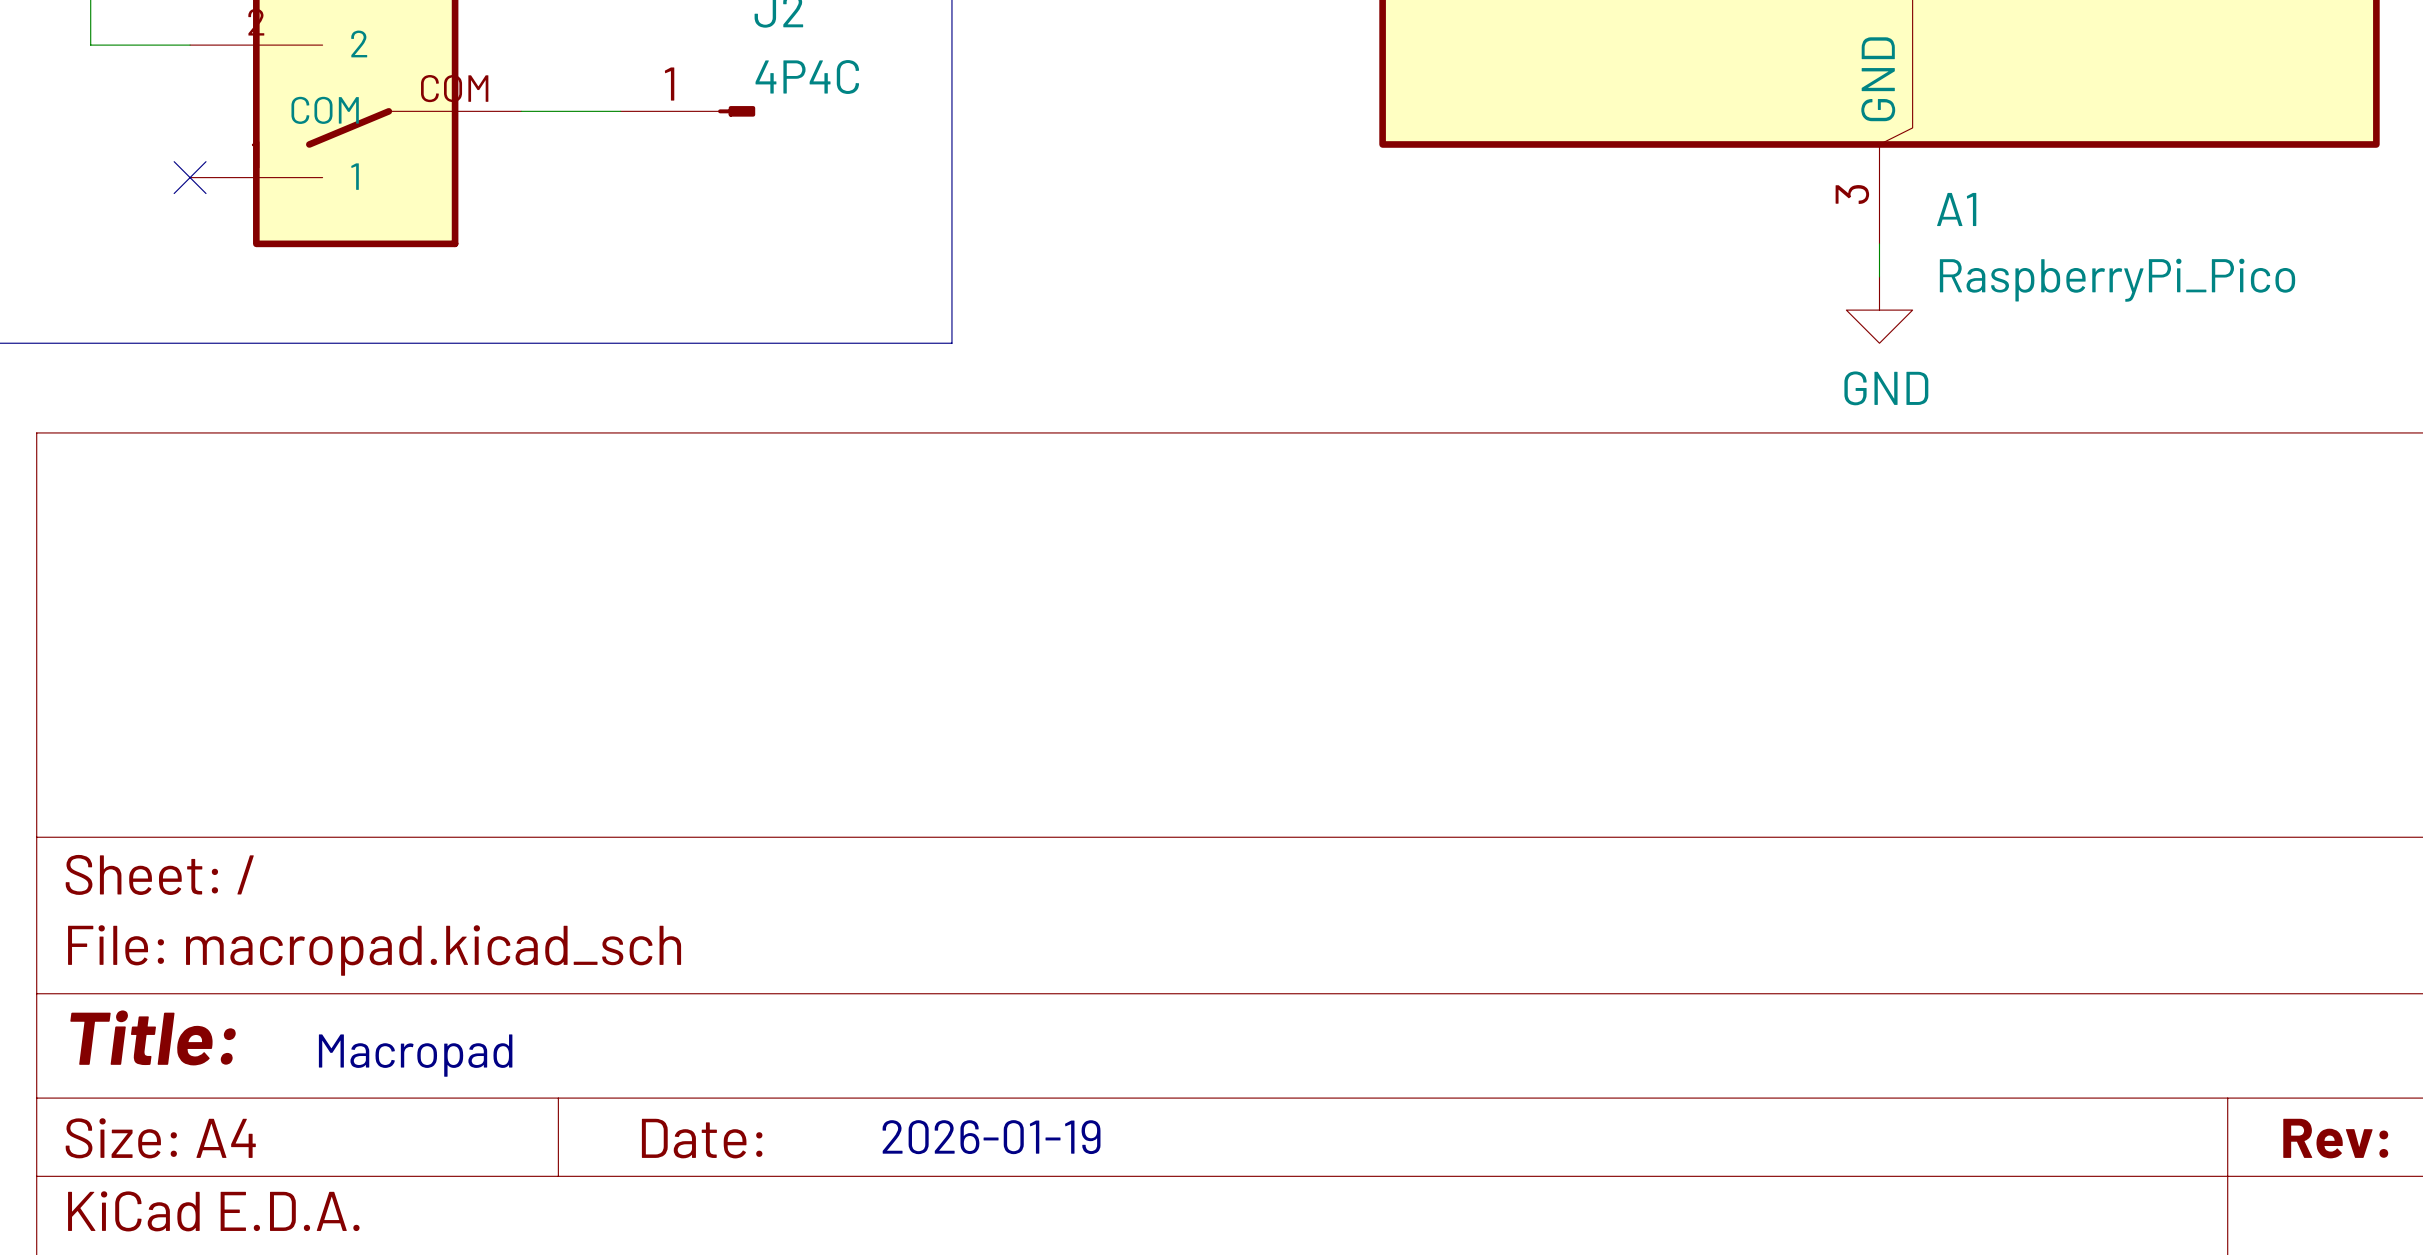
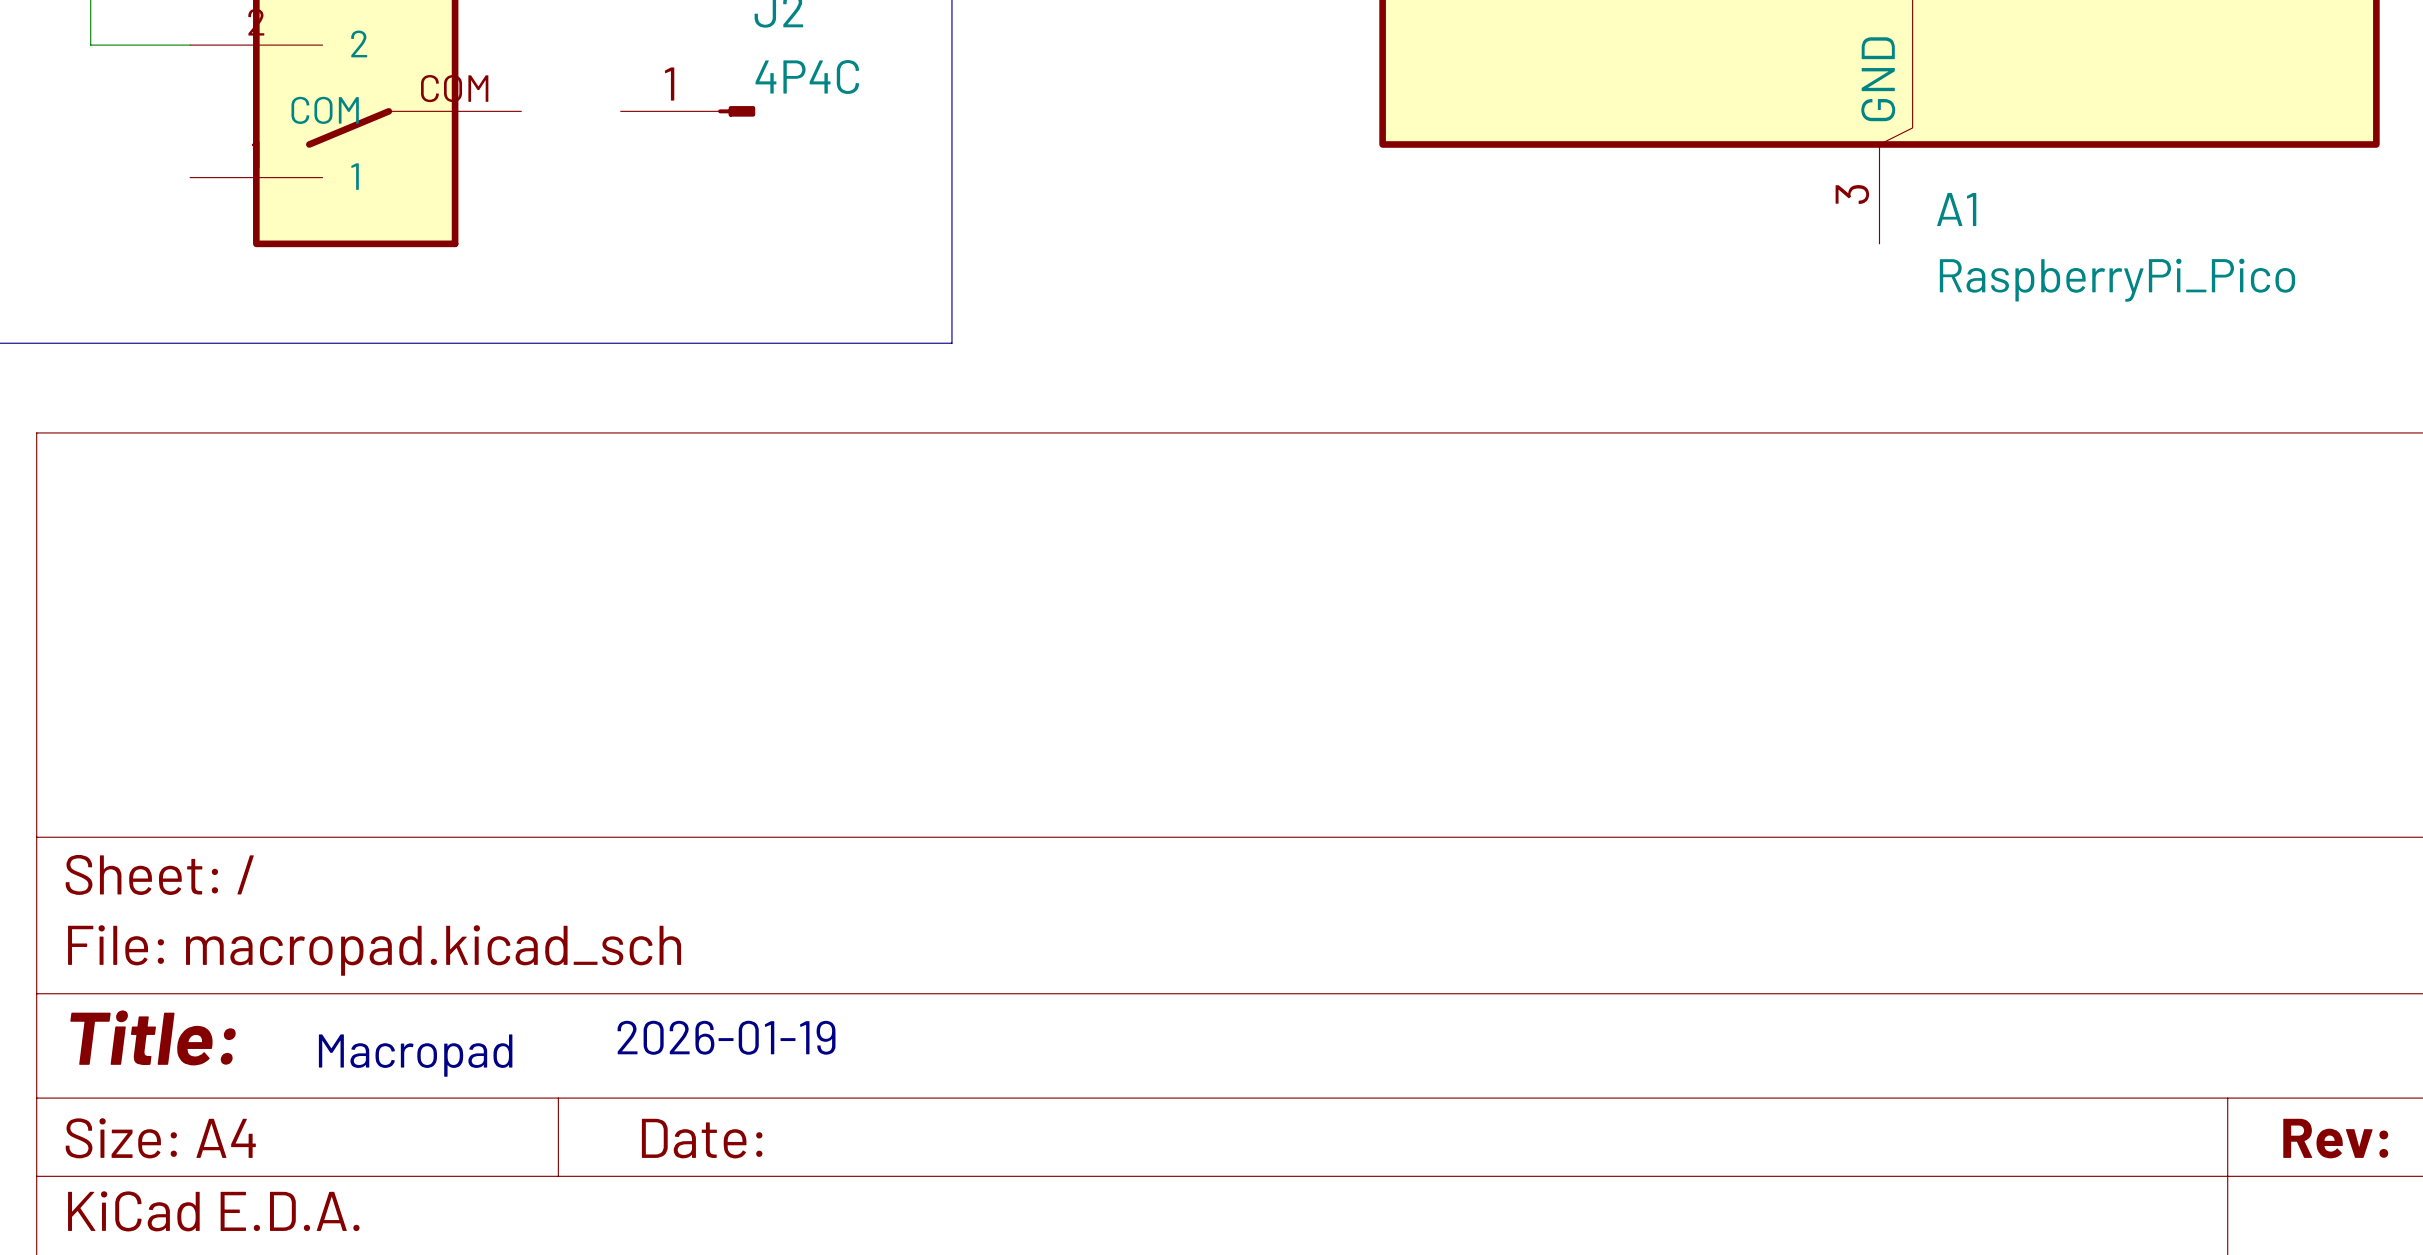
wire: (521, 111) (620, 111) -> none
no-connect mark: (190, 177) -> none
wire: (1879, 243) (1879, 276) -> none
power symbol: GND (1879, 310) -> none
text position: 2026-01-19 (991, 1137) -> 2026-01-19 (726, 1037)

